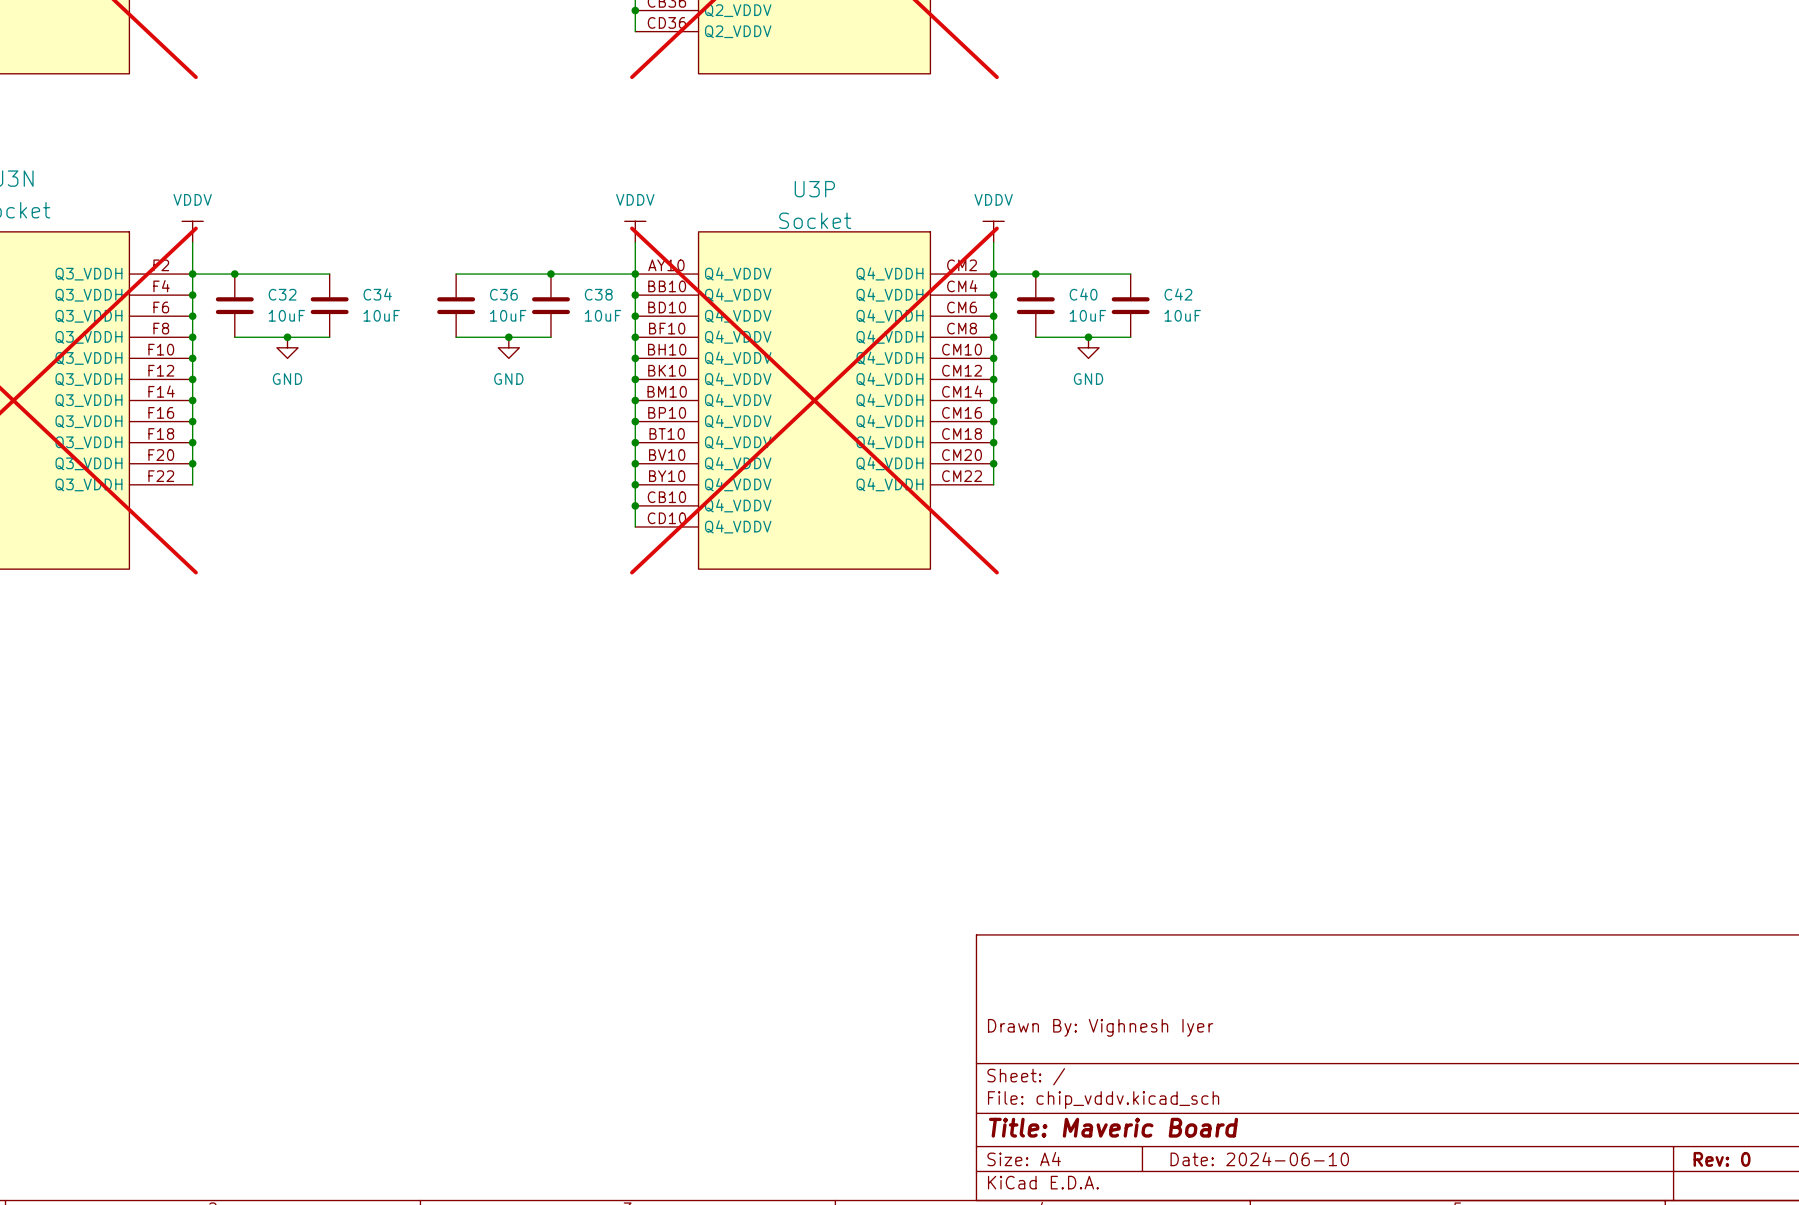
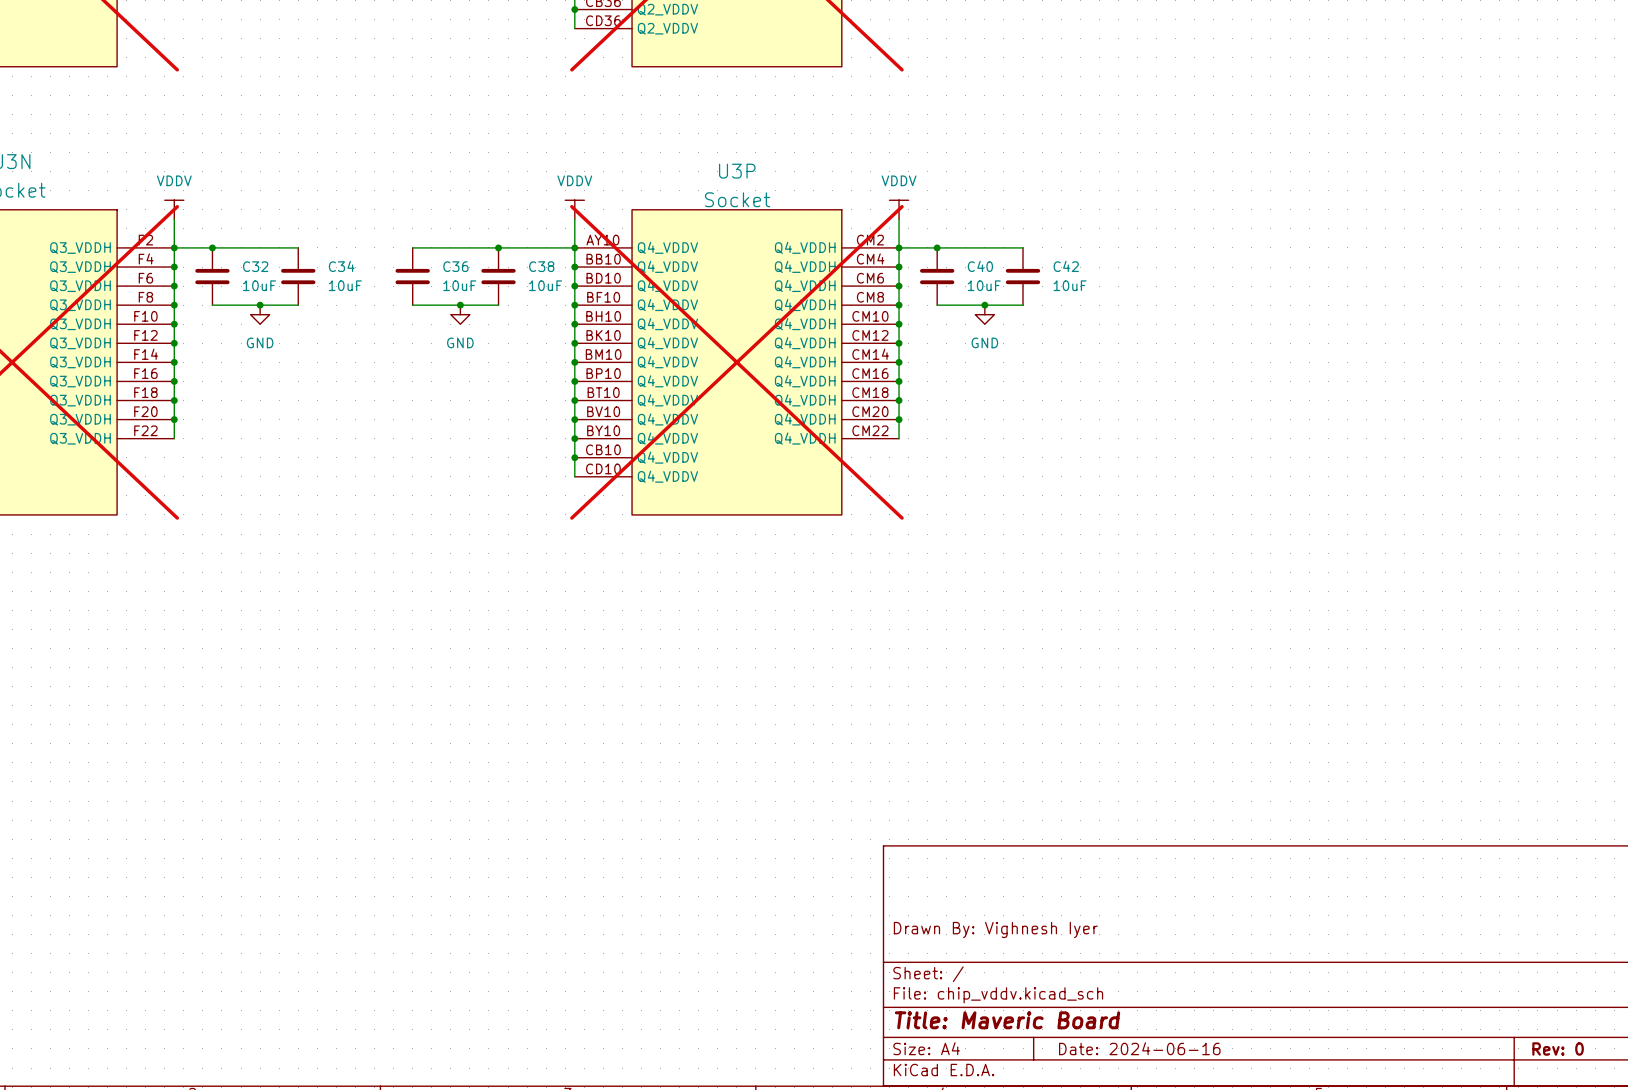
title block: Date: 2024-06-10 (1259, 1159) -> Date: 2024-06-16 (1139, 1048)

